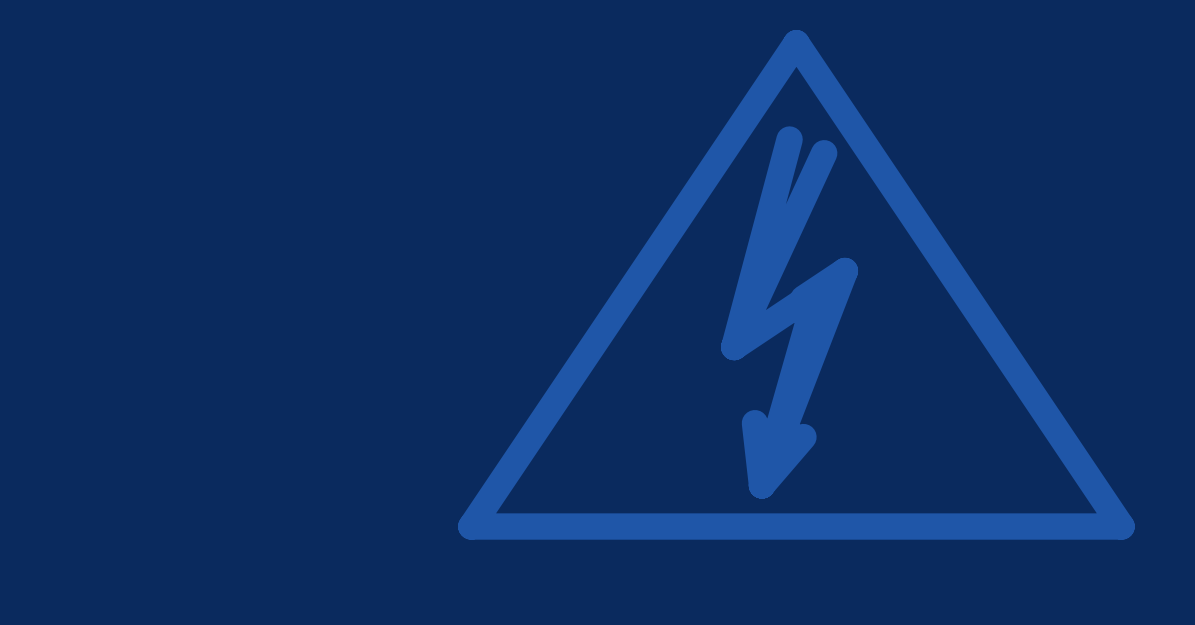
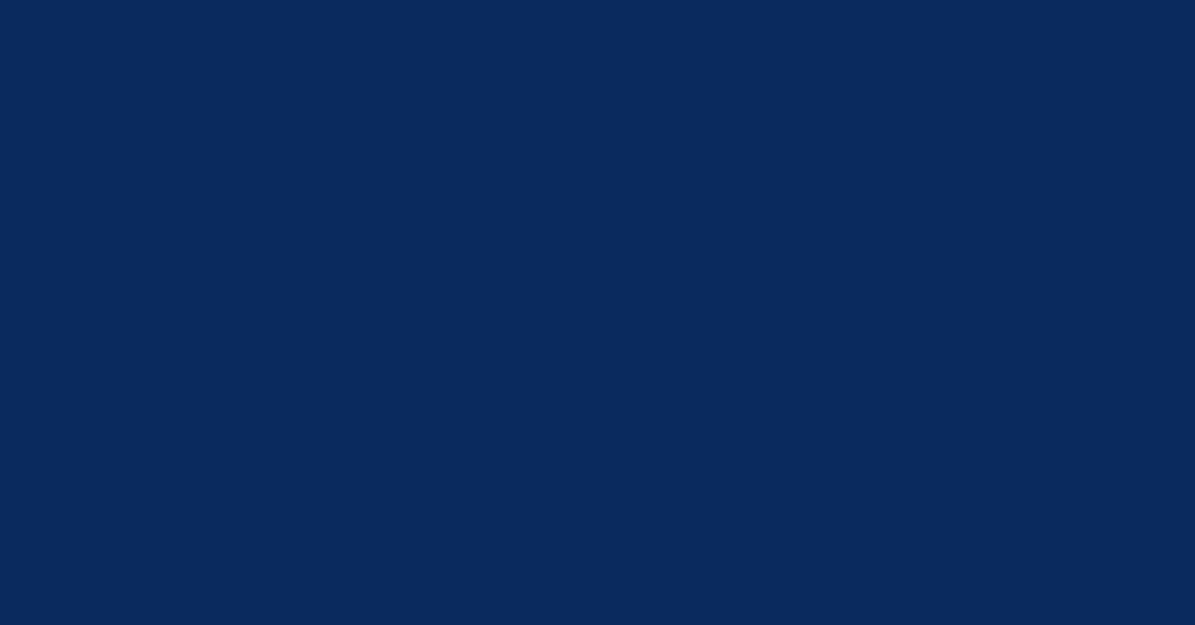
drawing: [458, 30, 1135, 540] -> none

